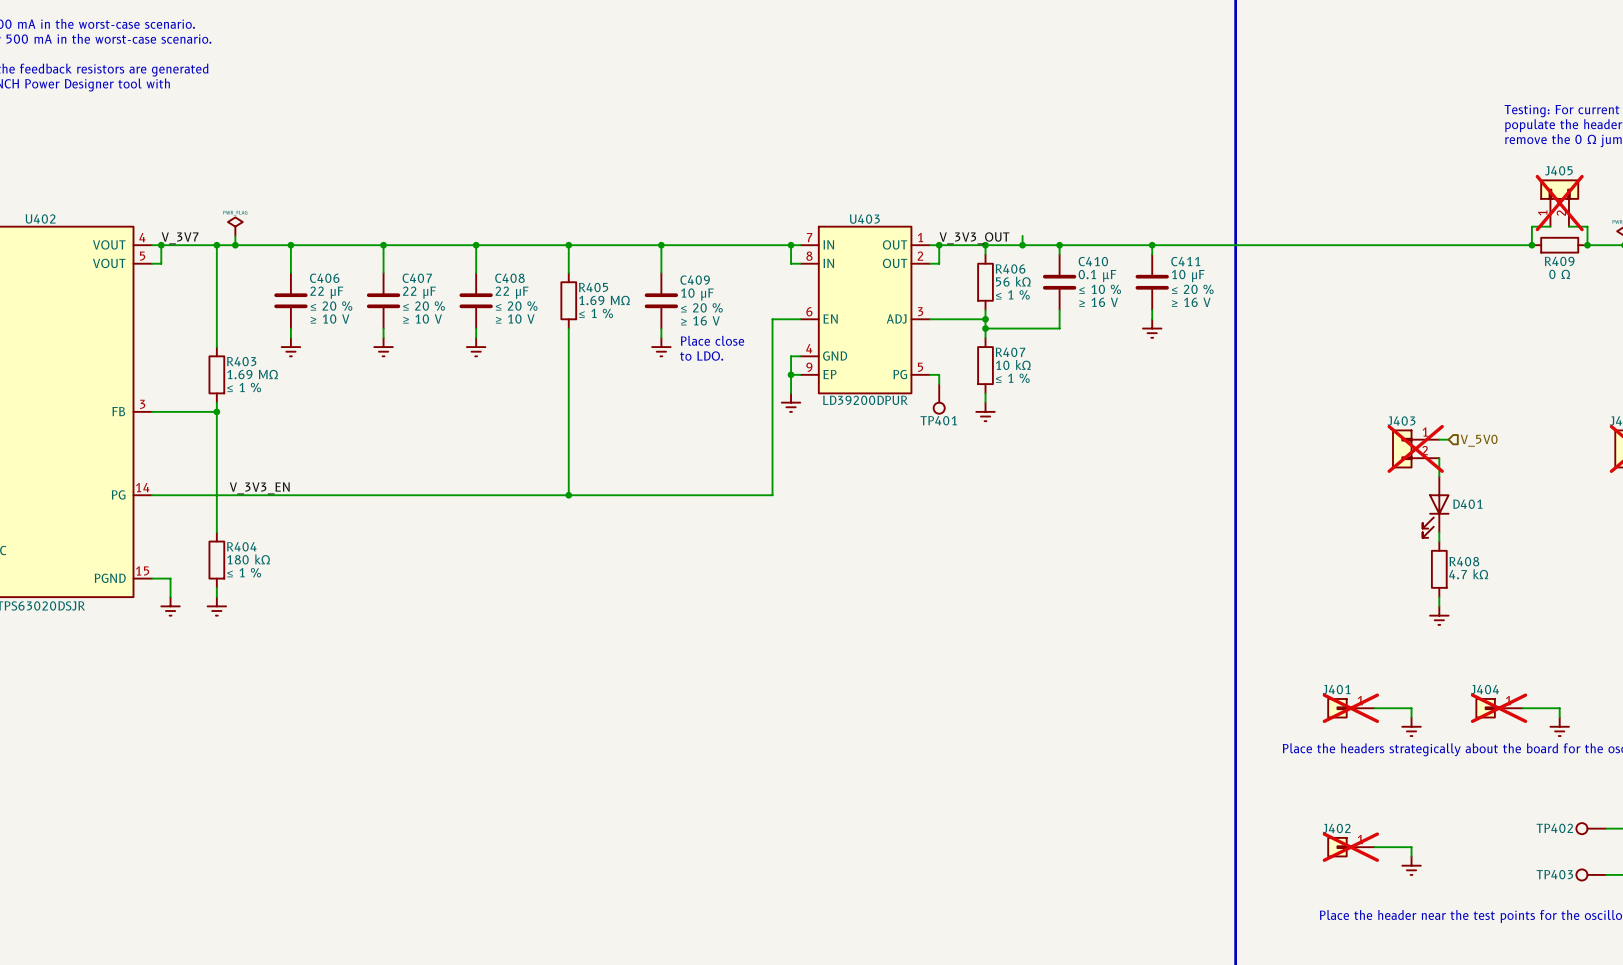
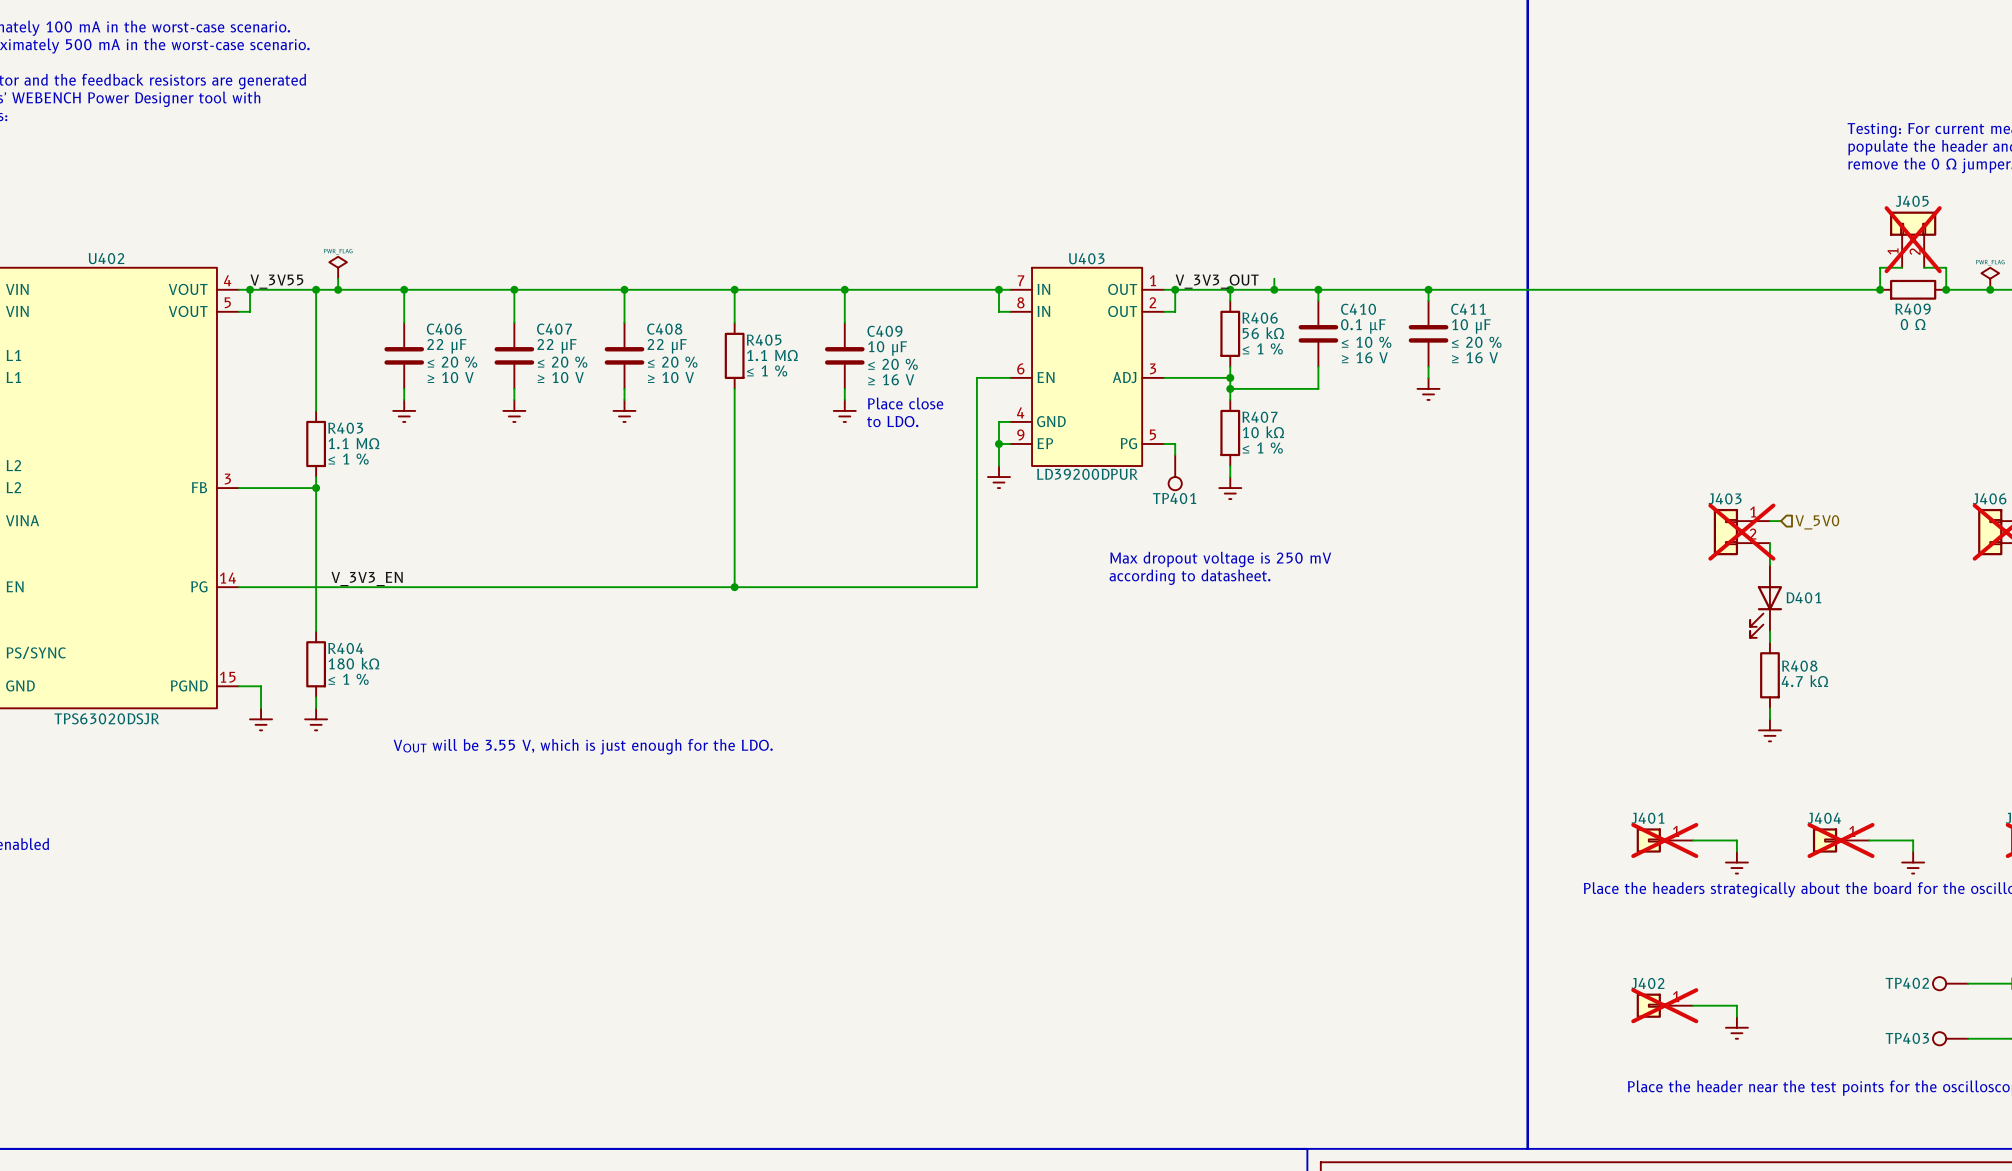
label: V_3V7 (180, 238) -> V_3V55 (276, 281)
R405 value: 1.69 MΩ (604, 300) -> 1.1 MΩ (772, 355)
R403 value: 1.69 MΩ (252, 374) -> 1.1 MΩ (353, 443)
text: none -> Max dropout voltage is 250 mV (1220, 559)
text: none -> according to datasheet. (1190, 577)
text: none -> VOUT will be 3.55 V, which is just enough for the LDO. (583, 746)

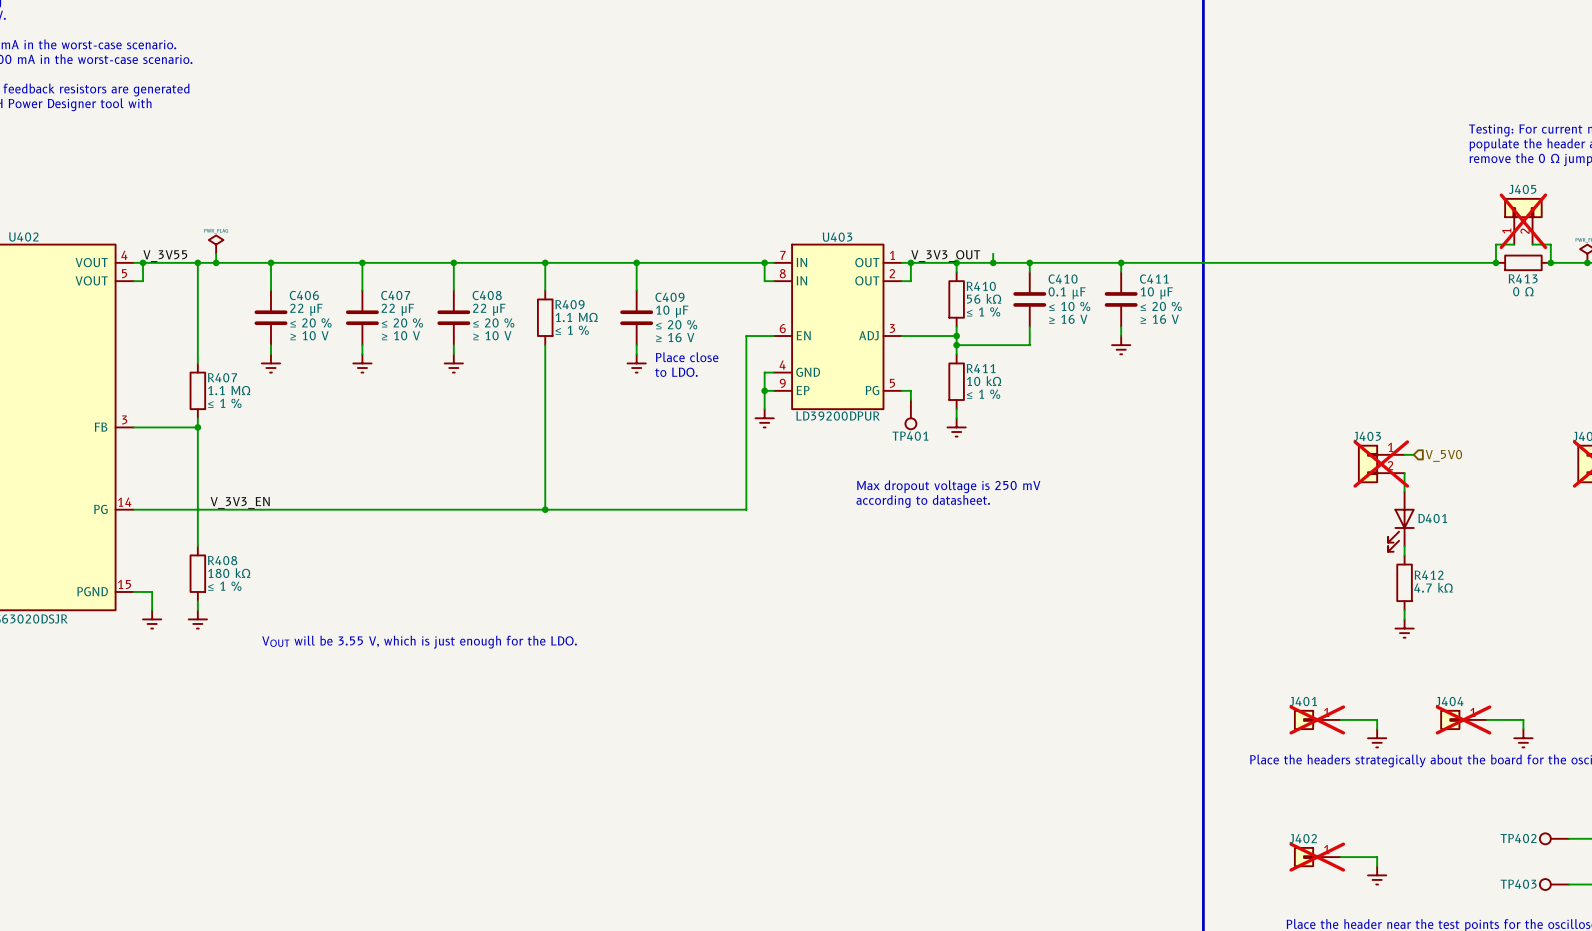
R409 name: R409 (1913, 309) -> R413 (1523, 278)
R406 name: R406 (1260, 318) -> R410 (981, 286)
R405 name: R405 (764, 340) -> R409 (569, 304)
R407 name: R407 (1259, 417) -> R411 (981, 368)
R403 name: R403 (345, 428) -> R407 (222, 377)
R404 name: R404 (345, 648) -> R408 (222, 560)
R408 name: R408 (1799, 666) -> R412 (1429, 575)

